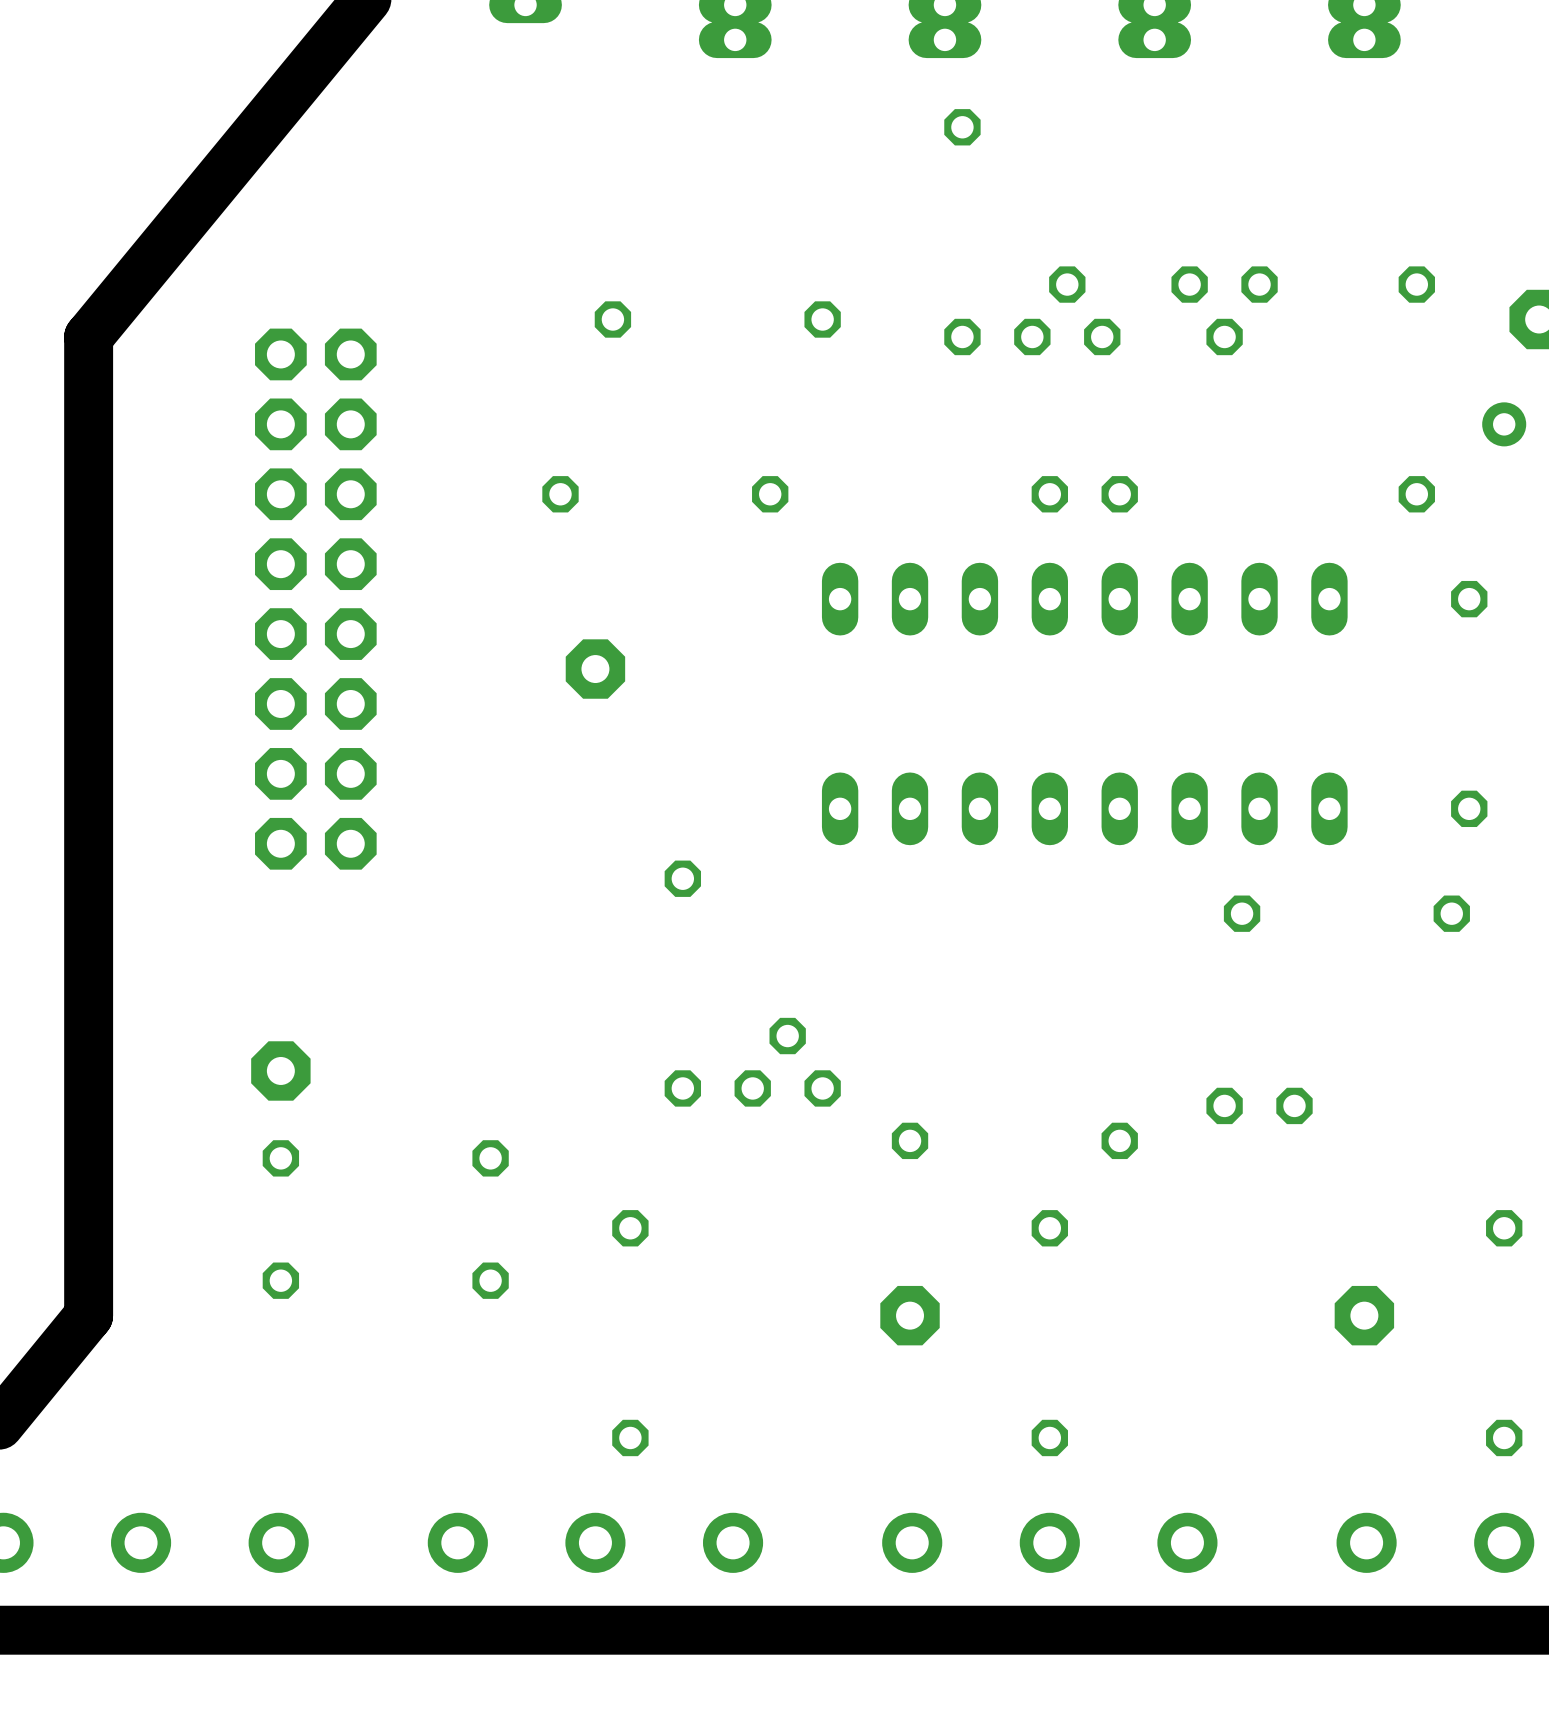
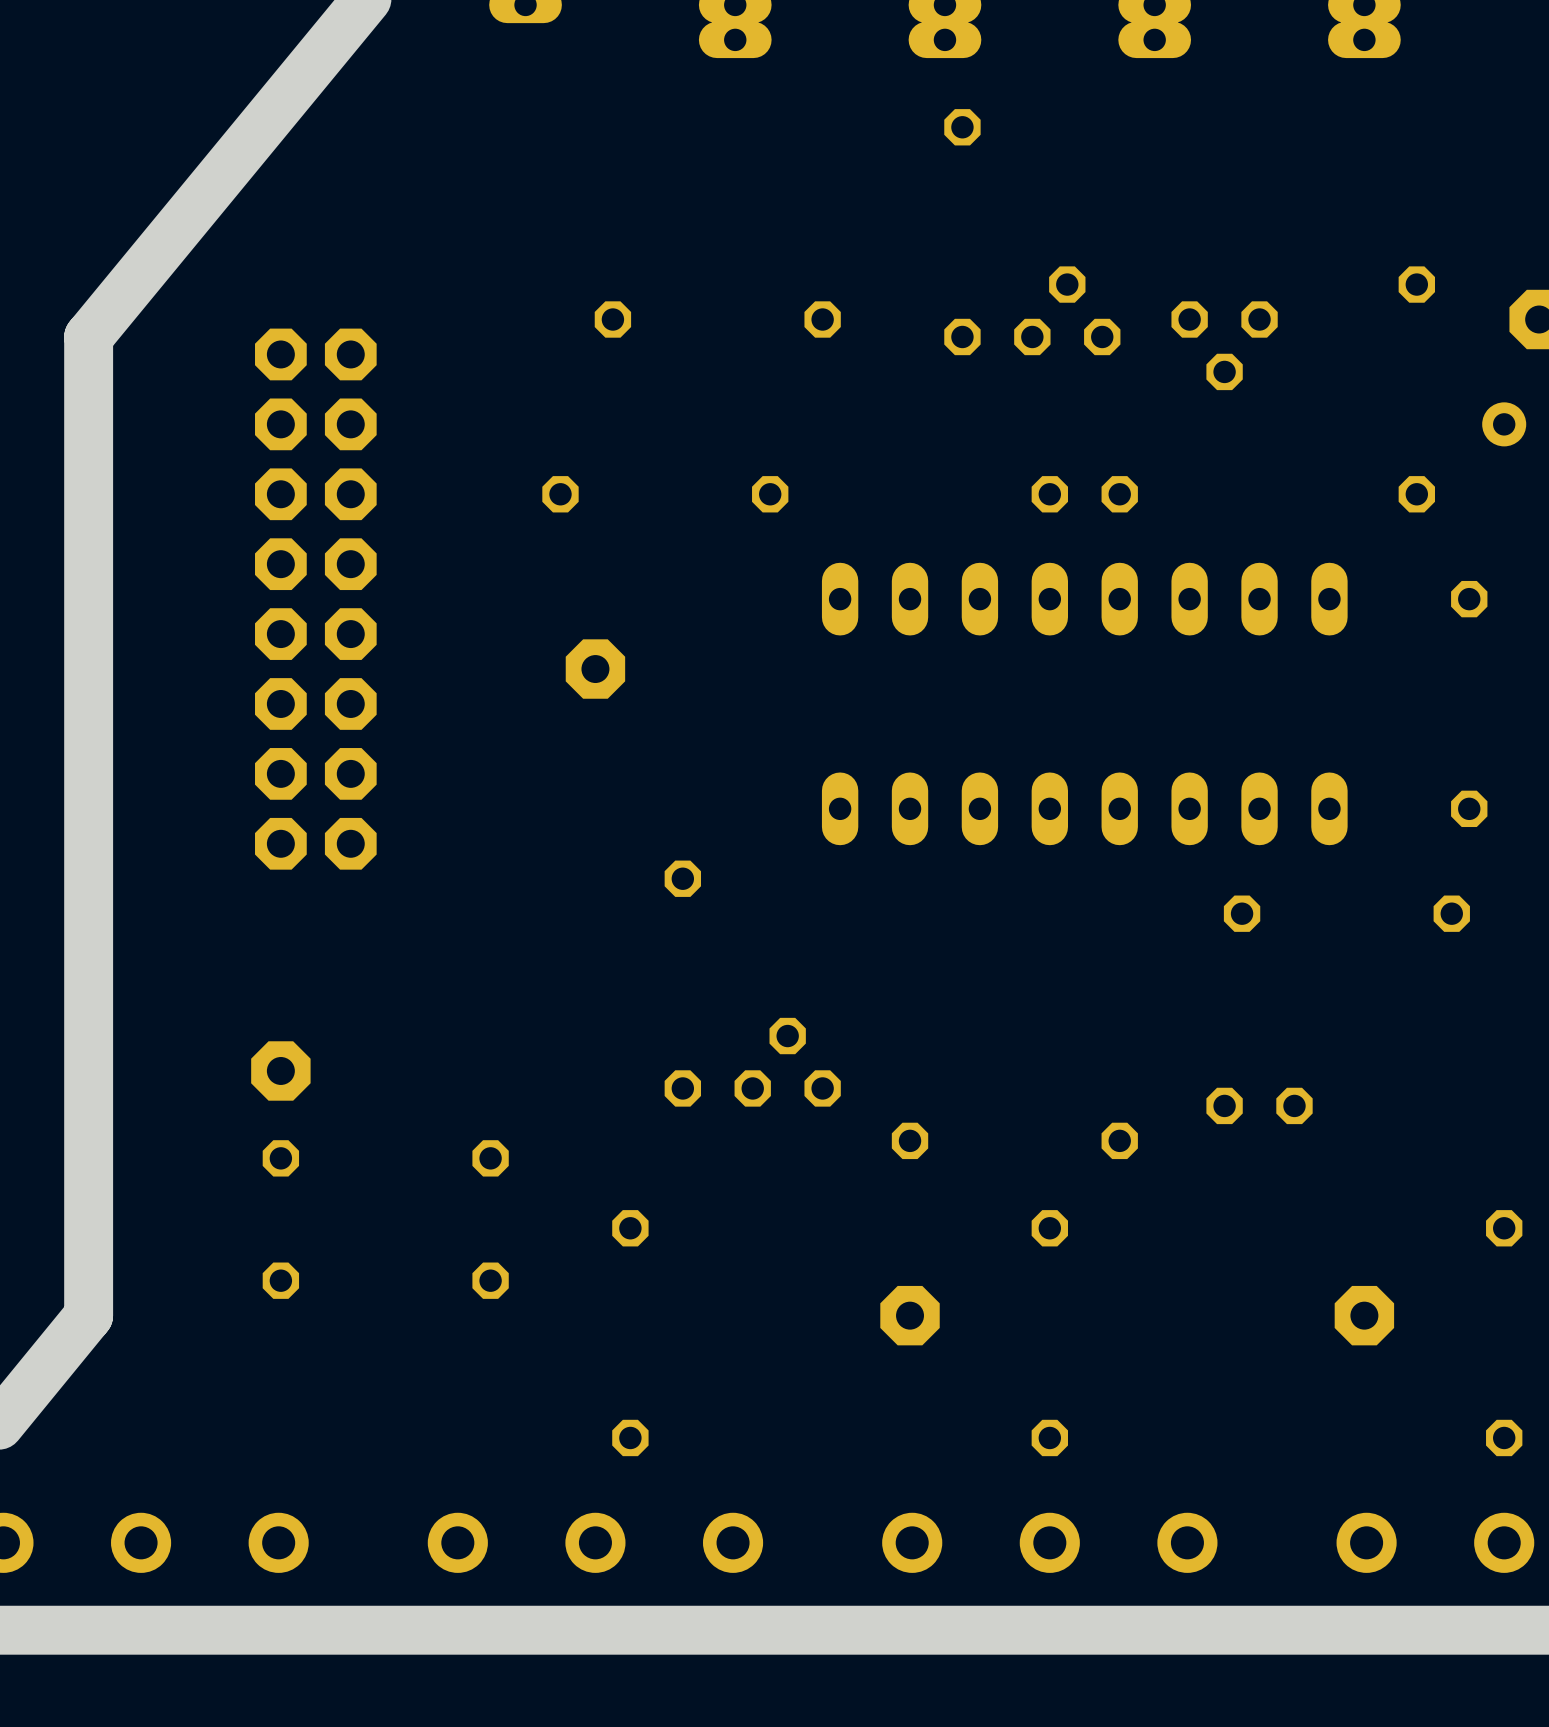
part position: (1224, 310) -> (1224, 345)

